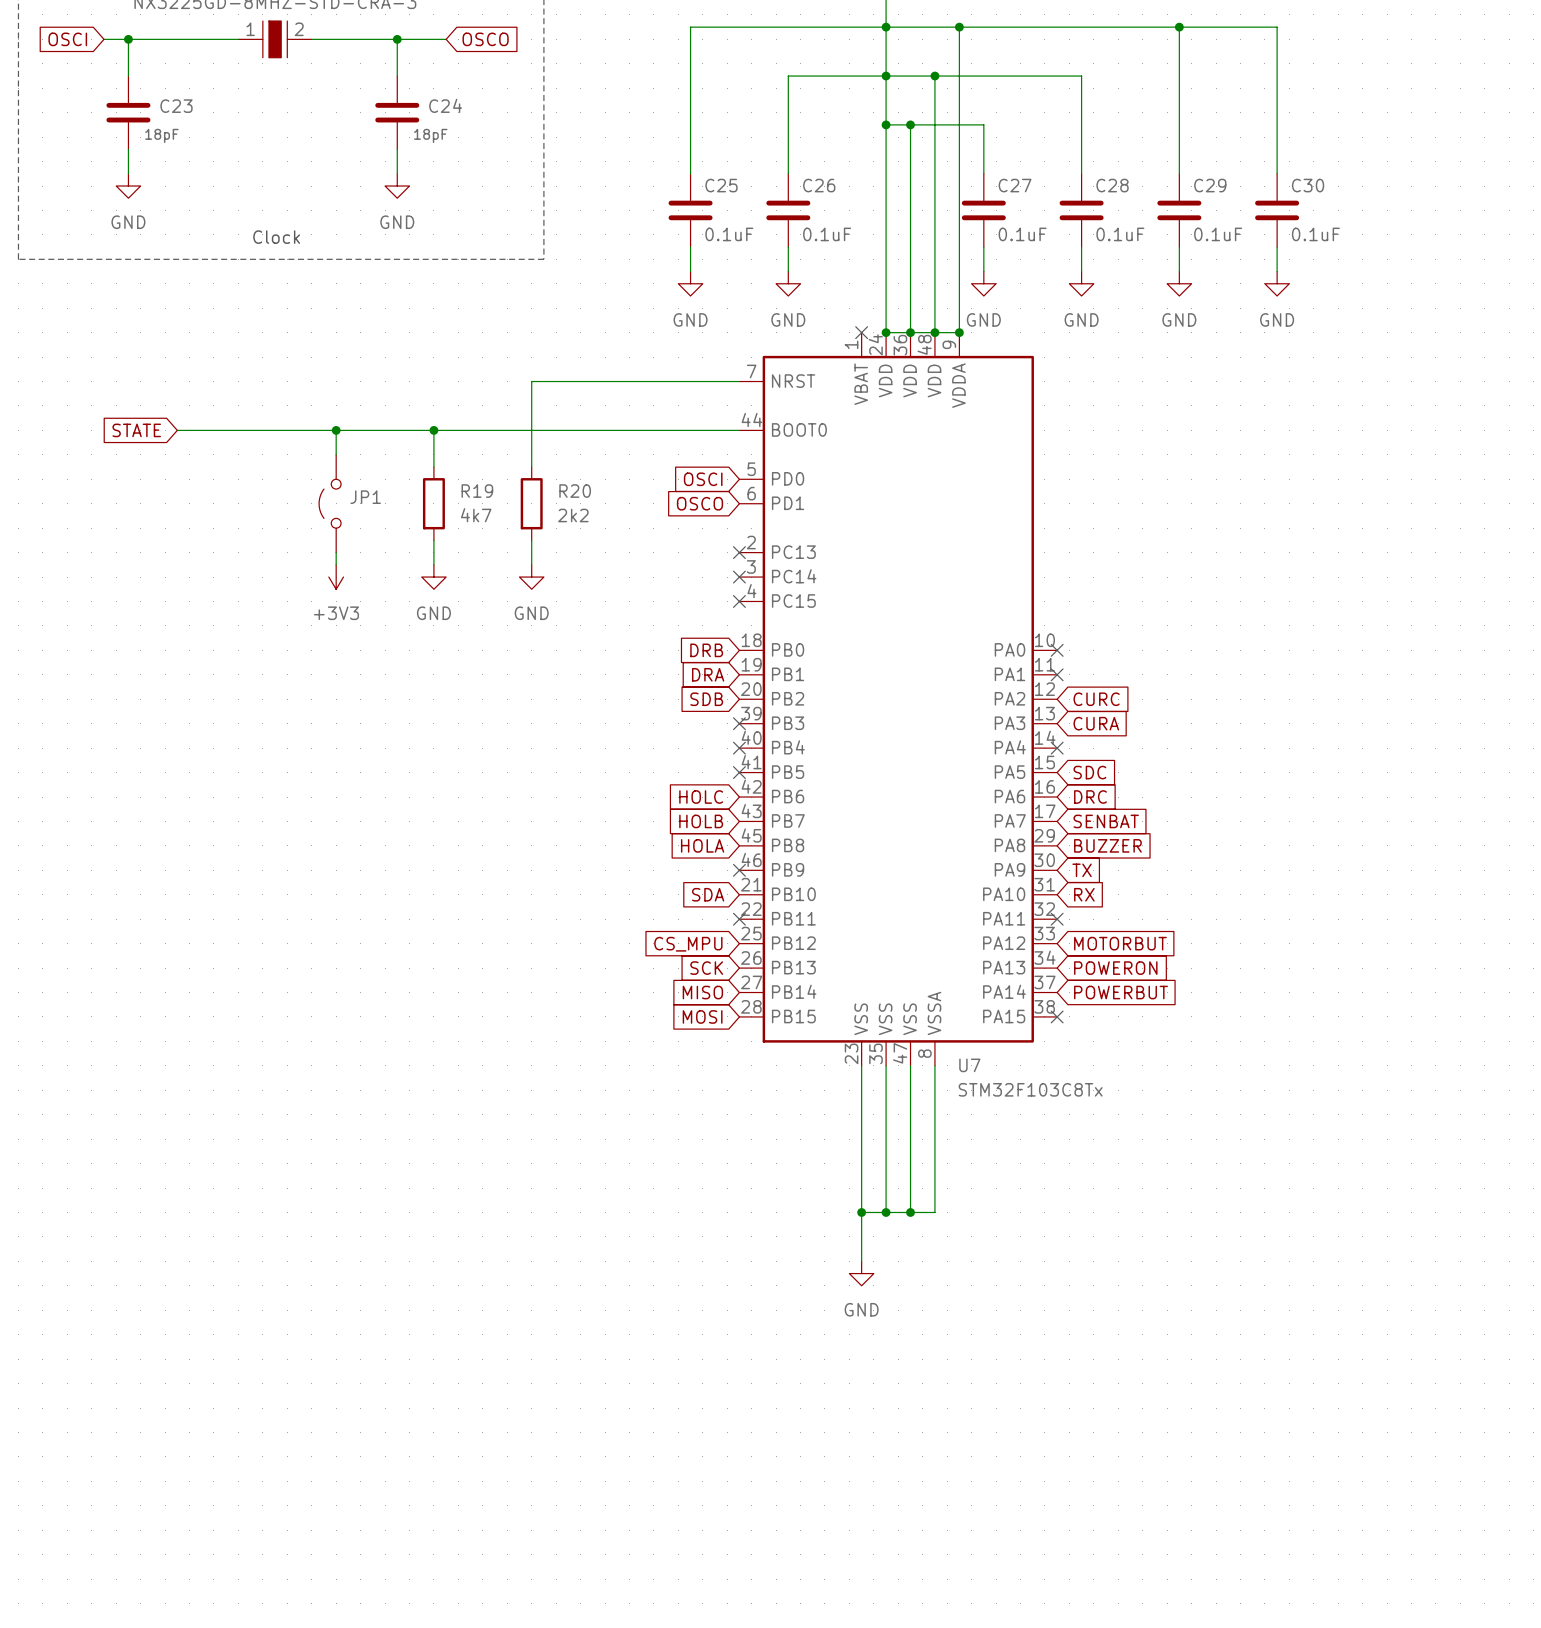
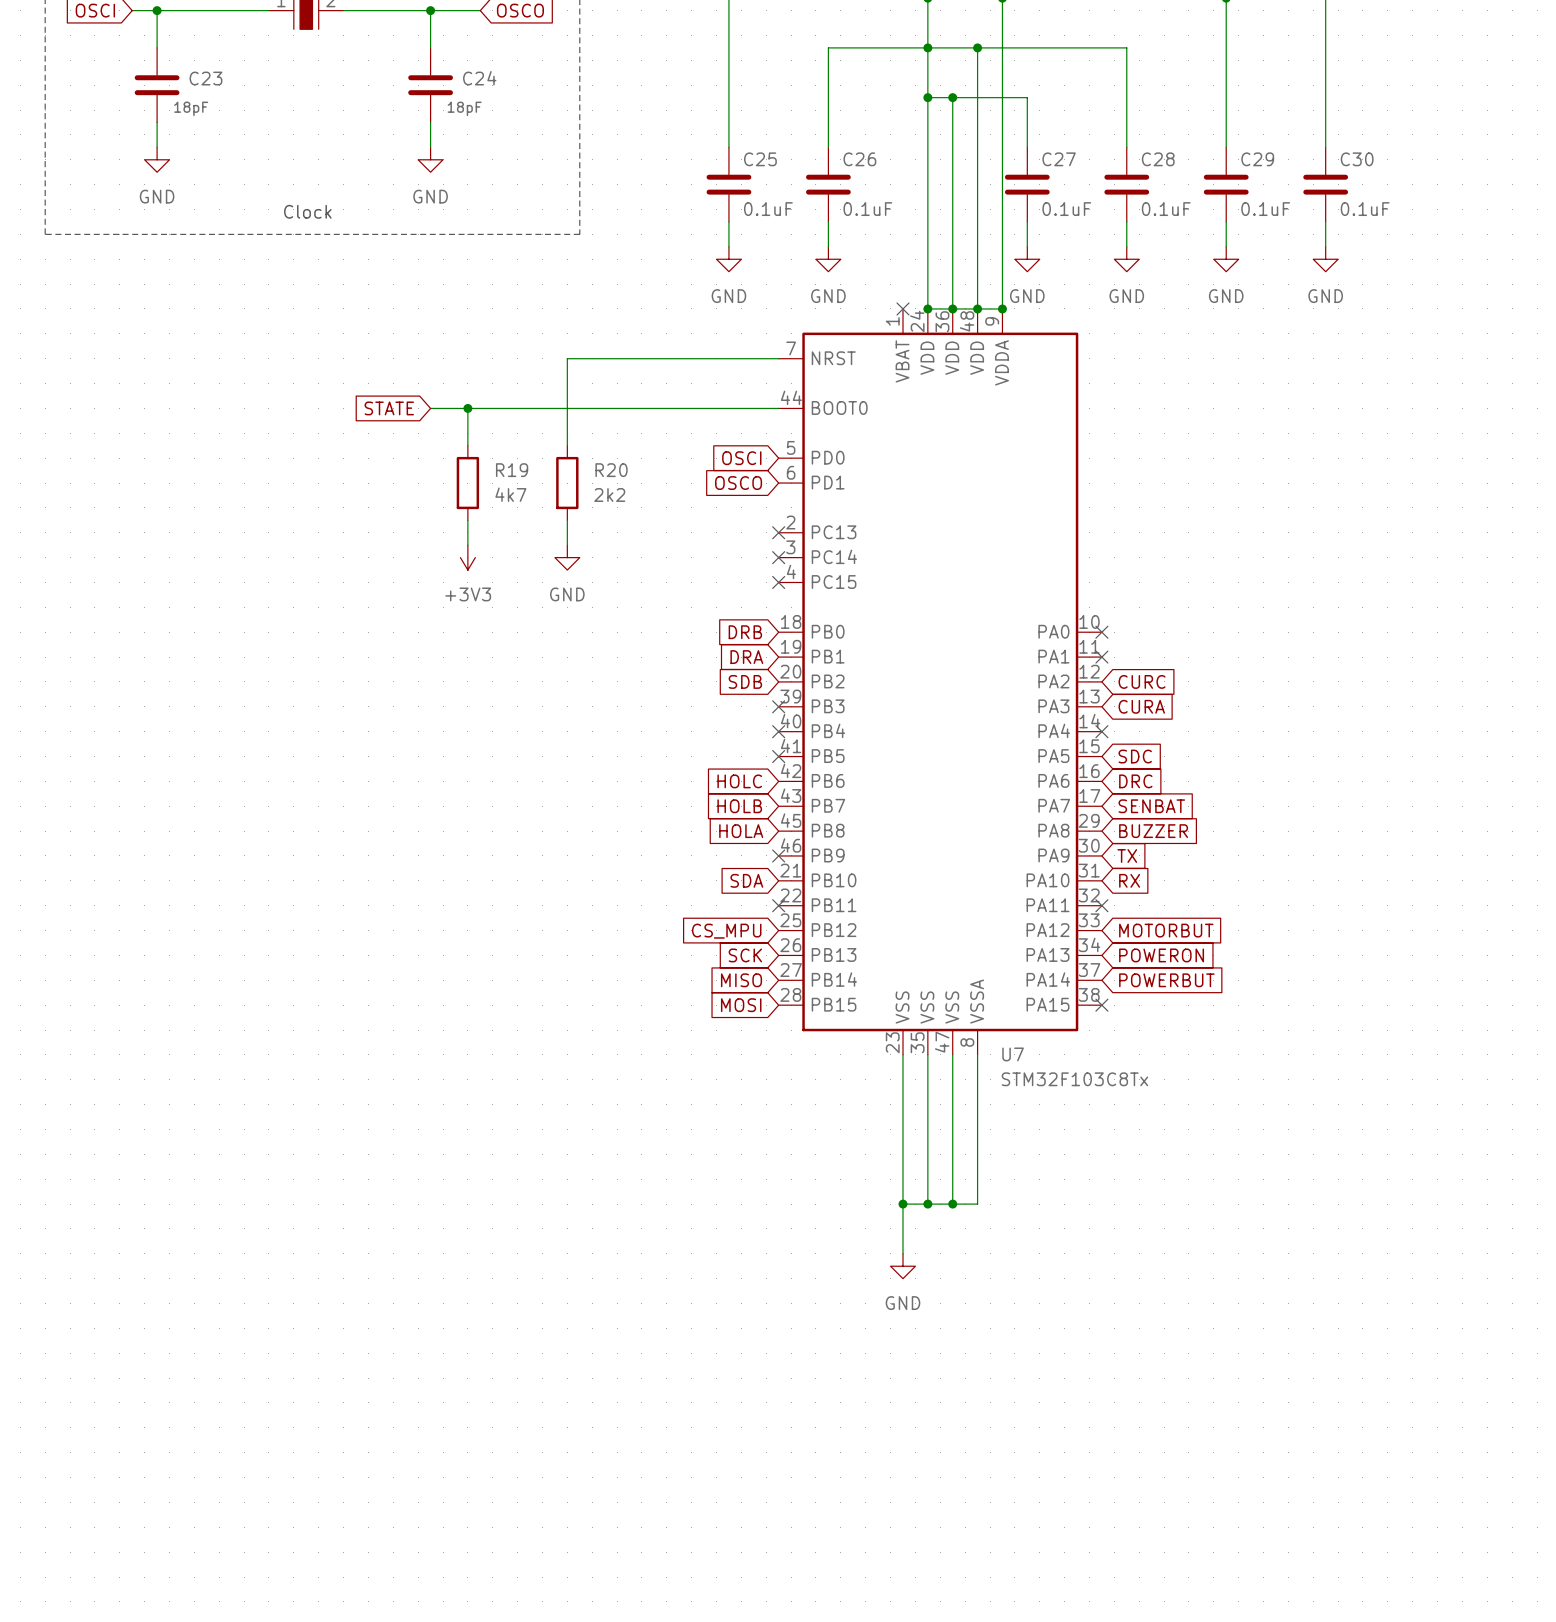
global label position: STATE (136, 430) -> STATE (389, 408)
wire: (177, 430) (397, 430) -> none
wire: (336, 430) (336, 454) -> none
junction: (336, 430) -> none
JP1: (330, 503) -> none
wire: (336, 552) (336, 564) -> none
power symbol: +3V3 (336, 577) -> none
power symbol: GND (433, 577) -> +3V3 (467, 557)

